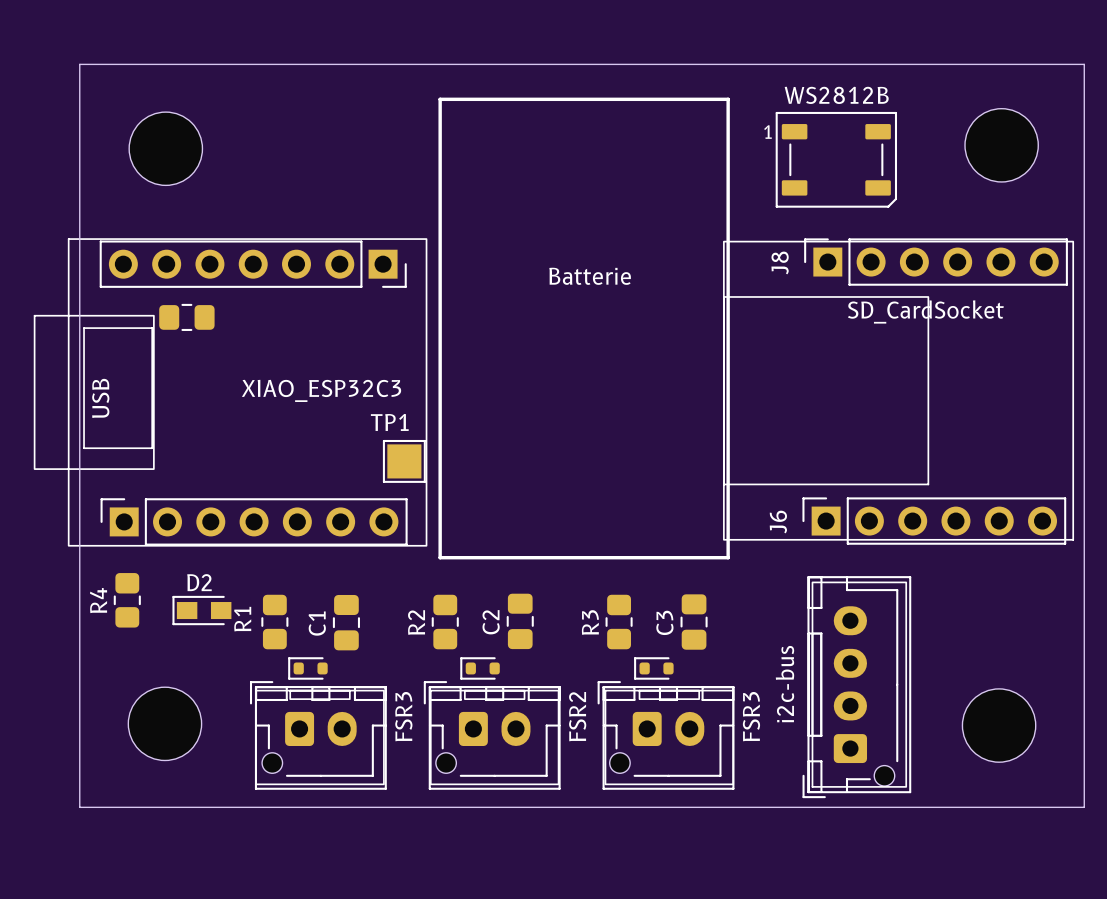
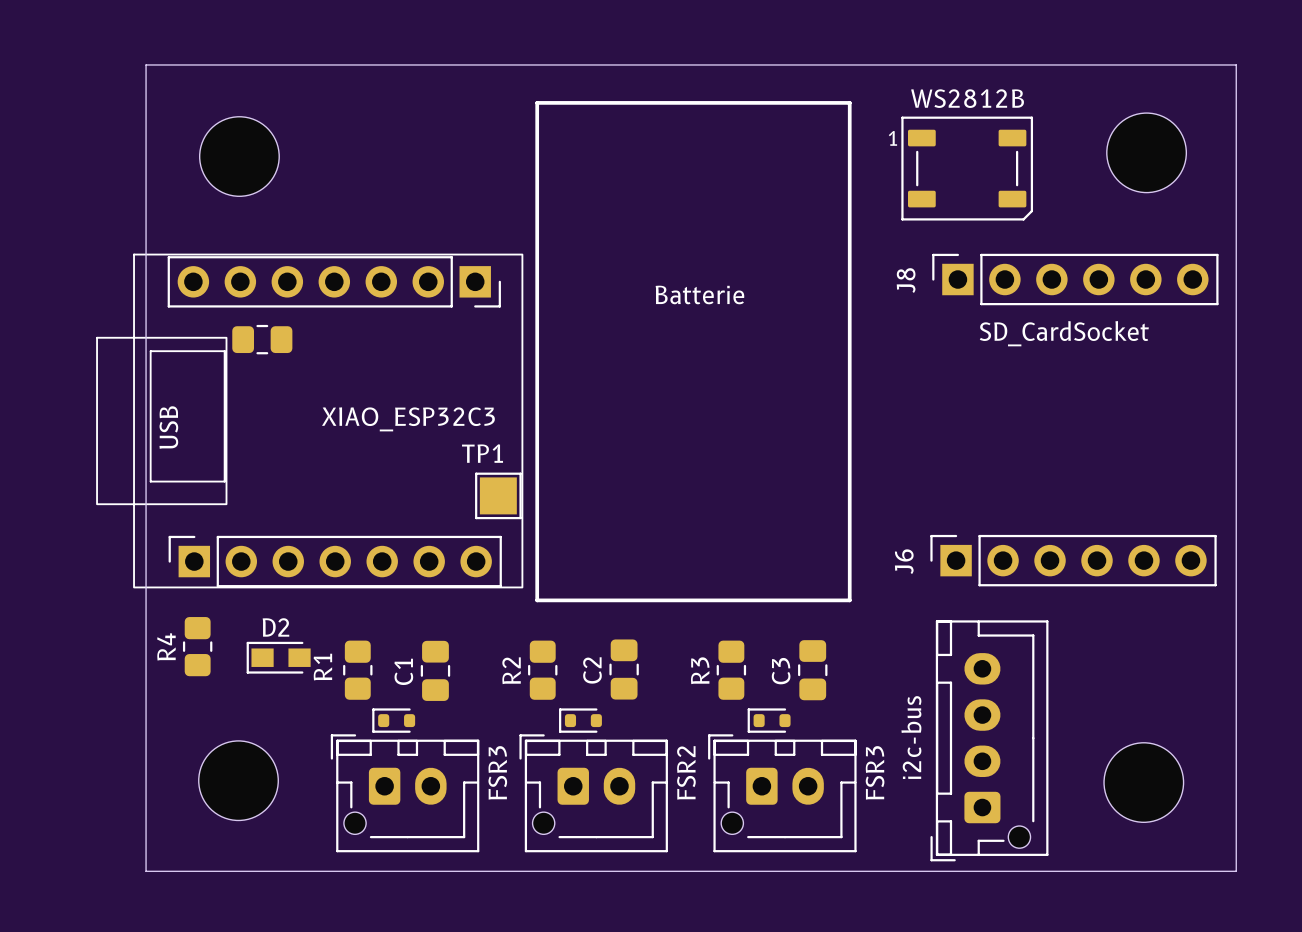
drawing: [723, 240, 1075, 541] -> none
drawing: [811, 581, 908, 788] -> none
drawing: [255, 689, 385, 786] -> none
drawing: [429, 689, 560, 786] -> none
drawing: [604, 689, 735, 786] -> none

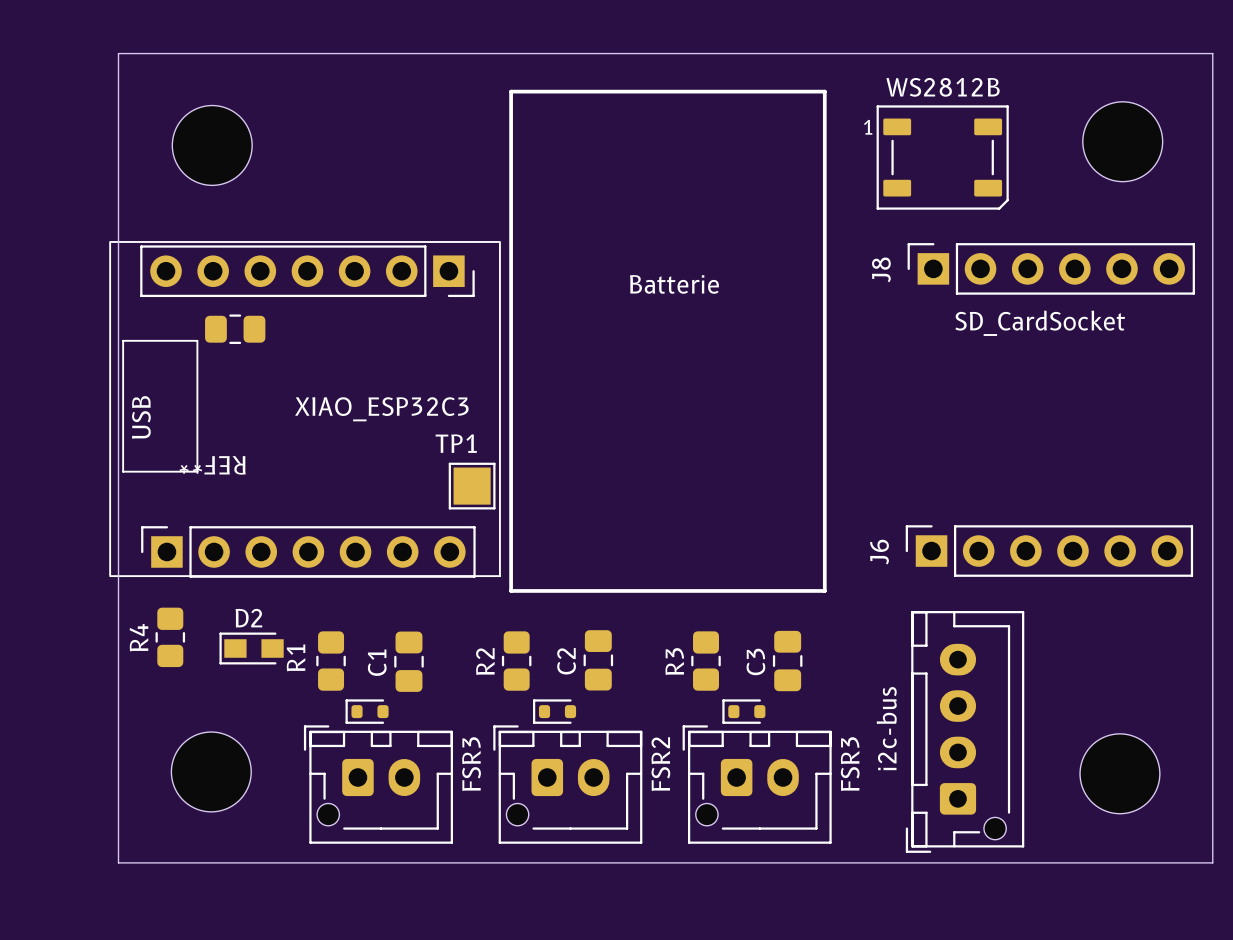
drawing: [96, 253, 524, 589] -> none
REF**: none -> (305, 409)

